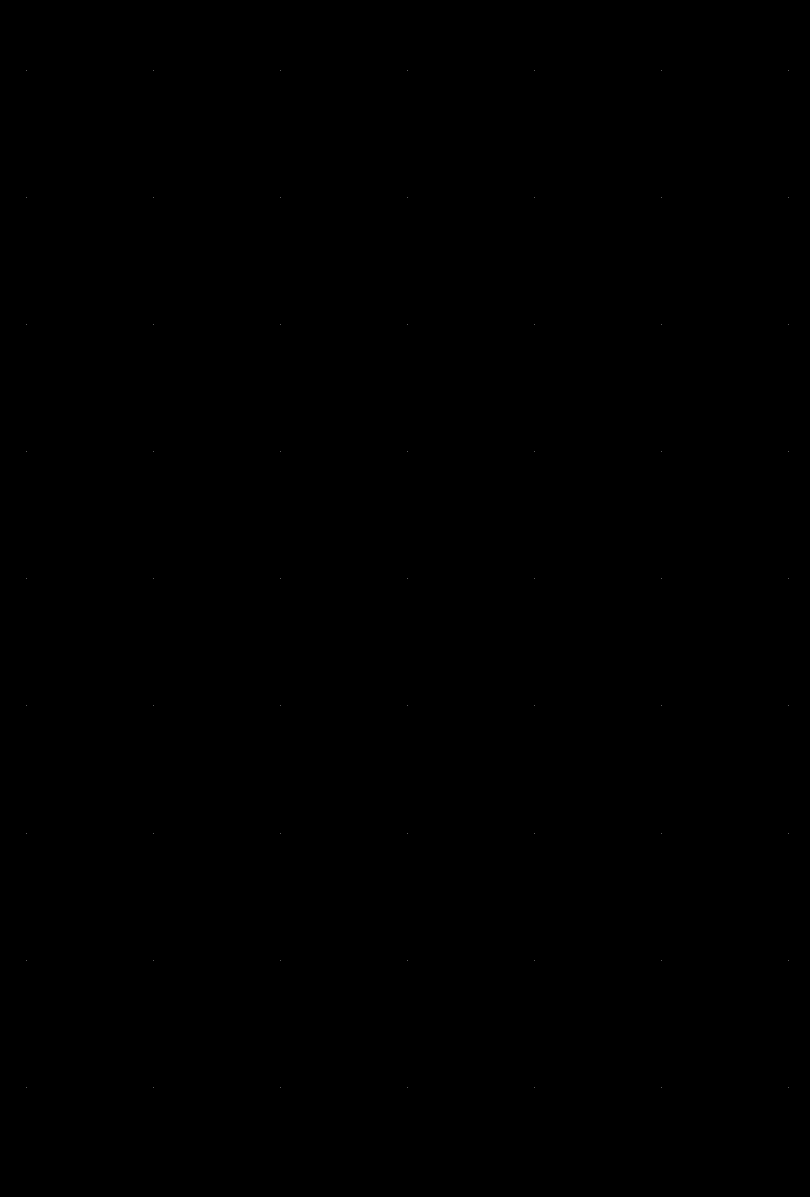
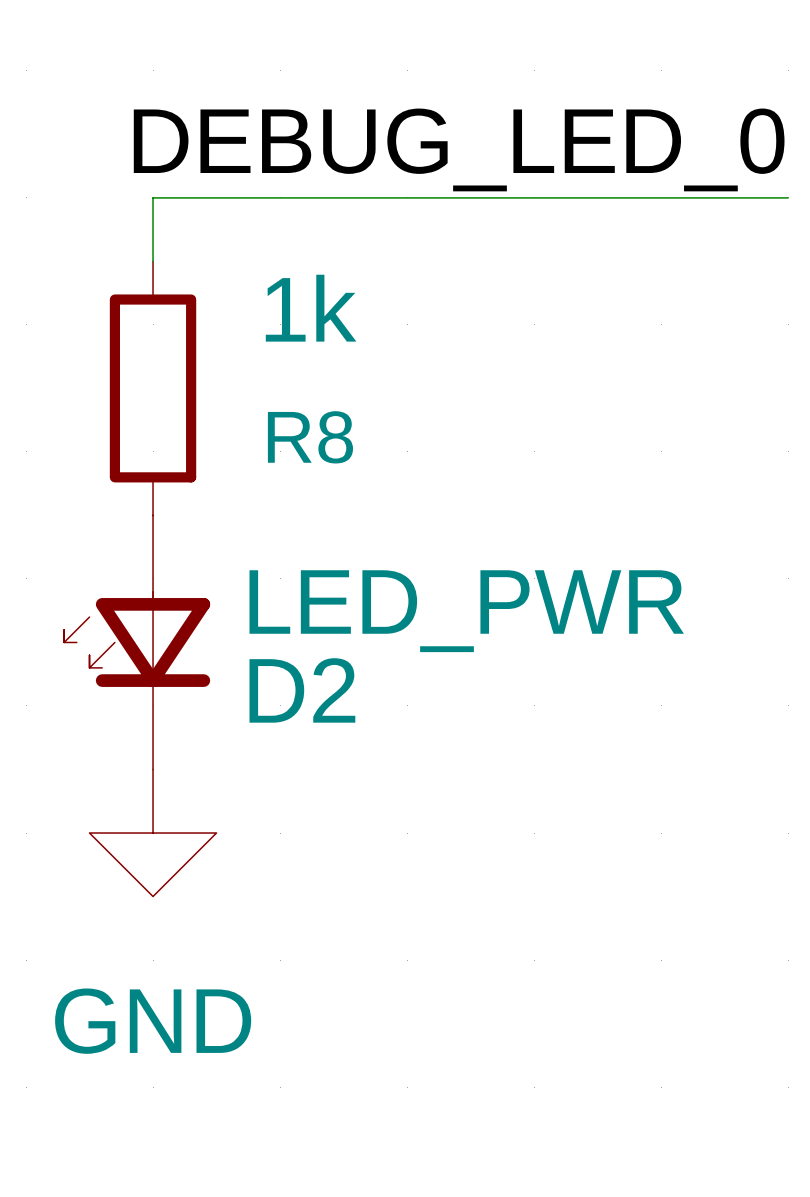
label: none -> DEBUG_LED_0 (459, 149)
wire: none -> (788, 197) (153, 197) (153, 261)
R8: none -> 1k (153, 388)
D2: none -> LED_PWR (137, 642)
power symbol: none -> GND (153, 833)

